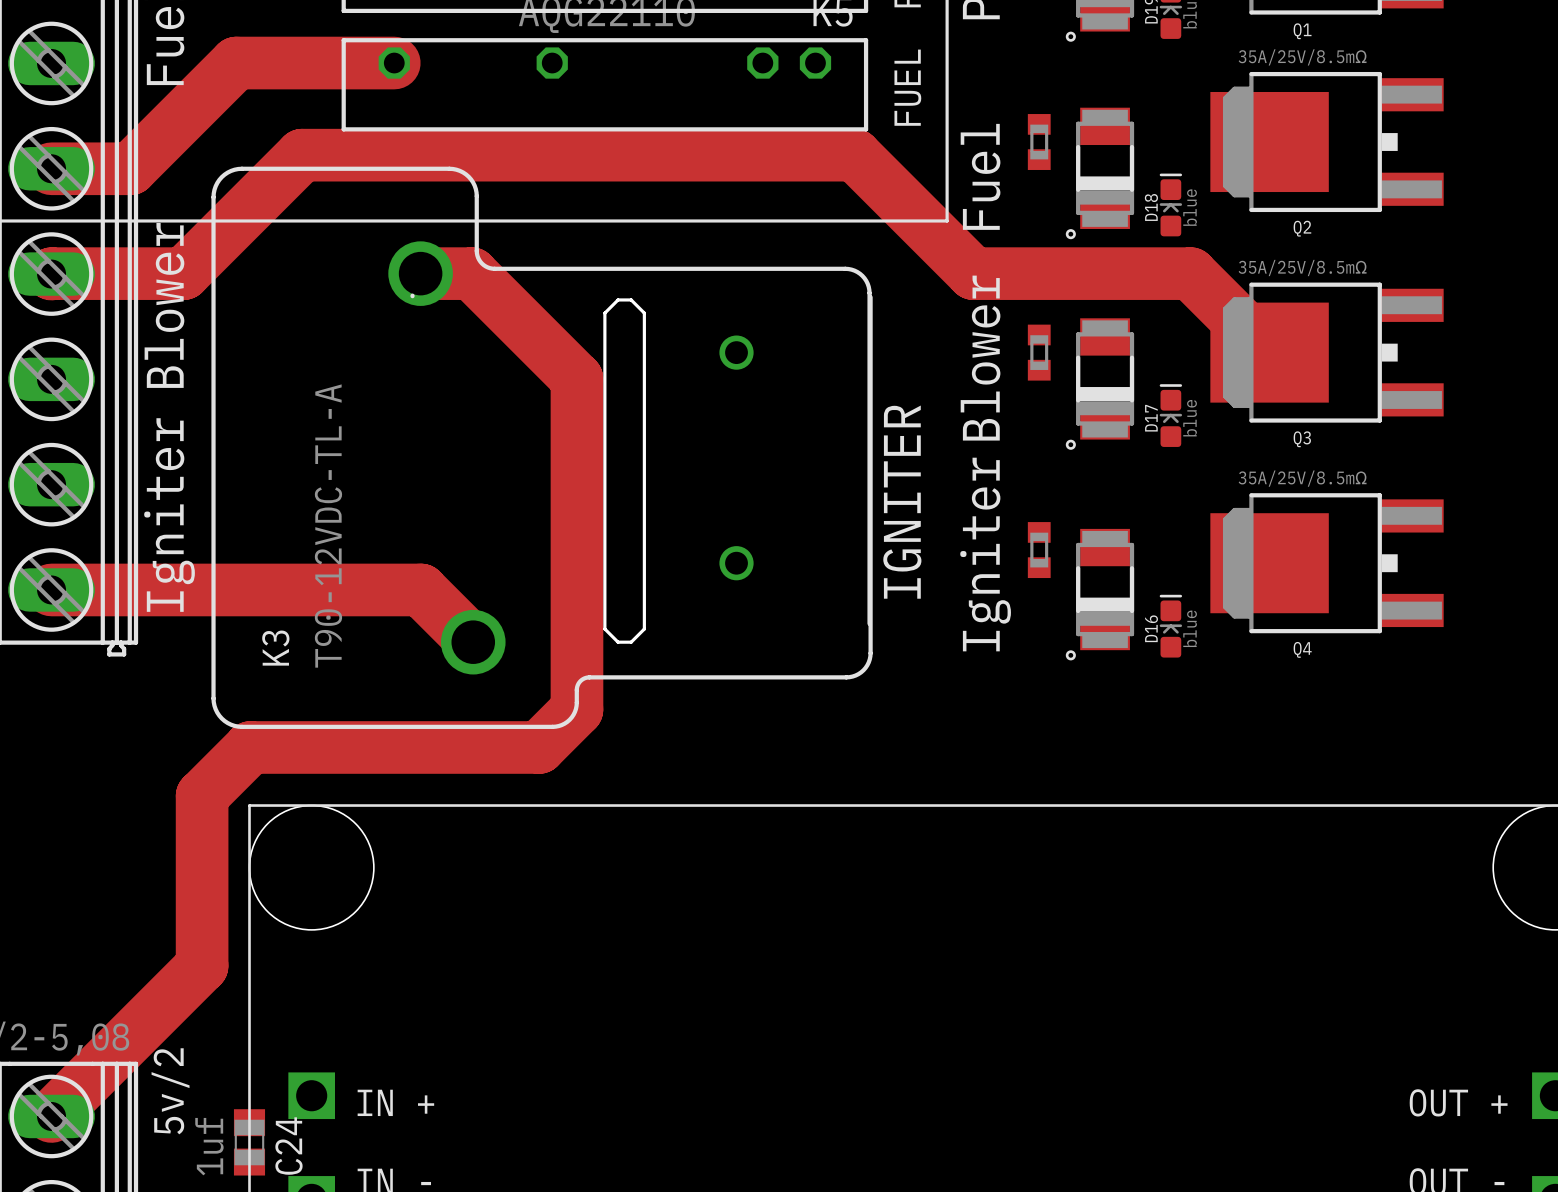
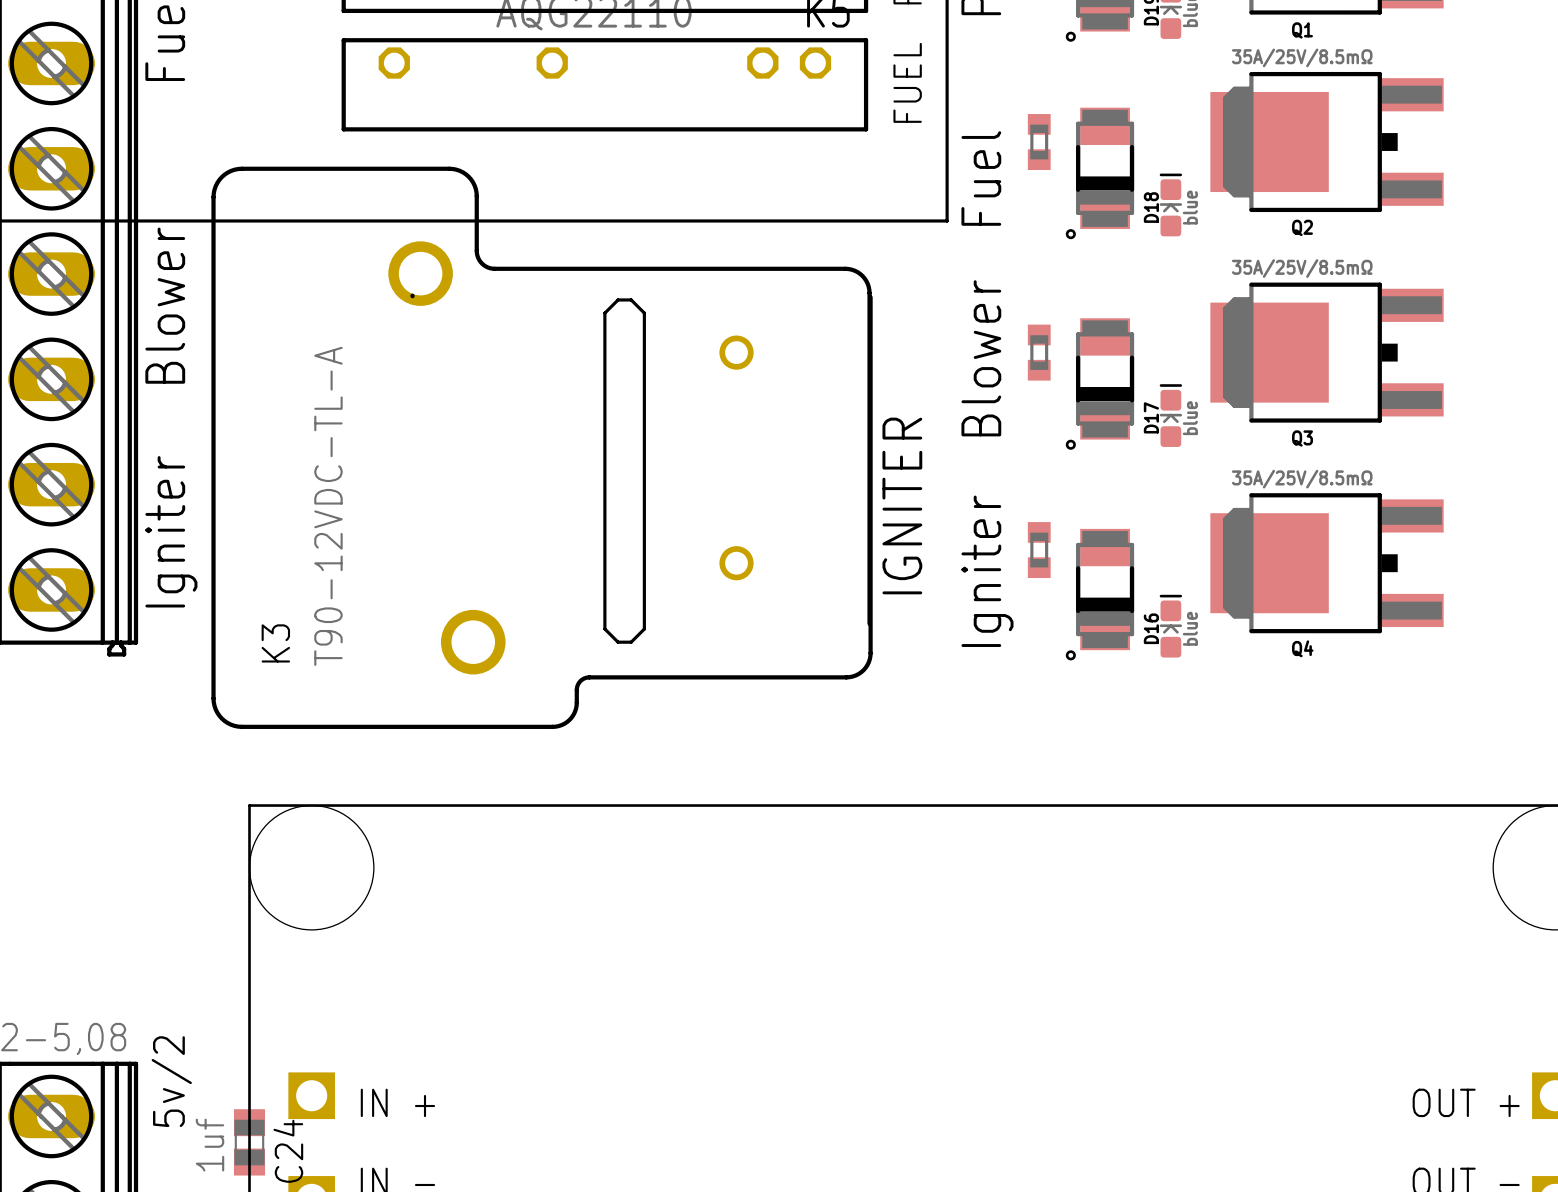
track: (394, 63) (236, 63) (130, 168) (51, 168) -> none
track: (420, 273) (471, 273) (576, 378) (576, 709) (539, 747) (250, 747) (202, 796) (202, 965) (51, 1116) -> none
track: (51, 274) (183, 273) (302, 155) (854, 155) (973, 273) (1190, 273) (1269, 352) -> none
track: (51, 589) (421, 589) (473, 642) -> none

